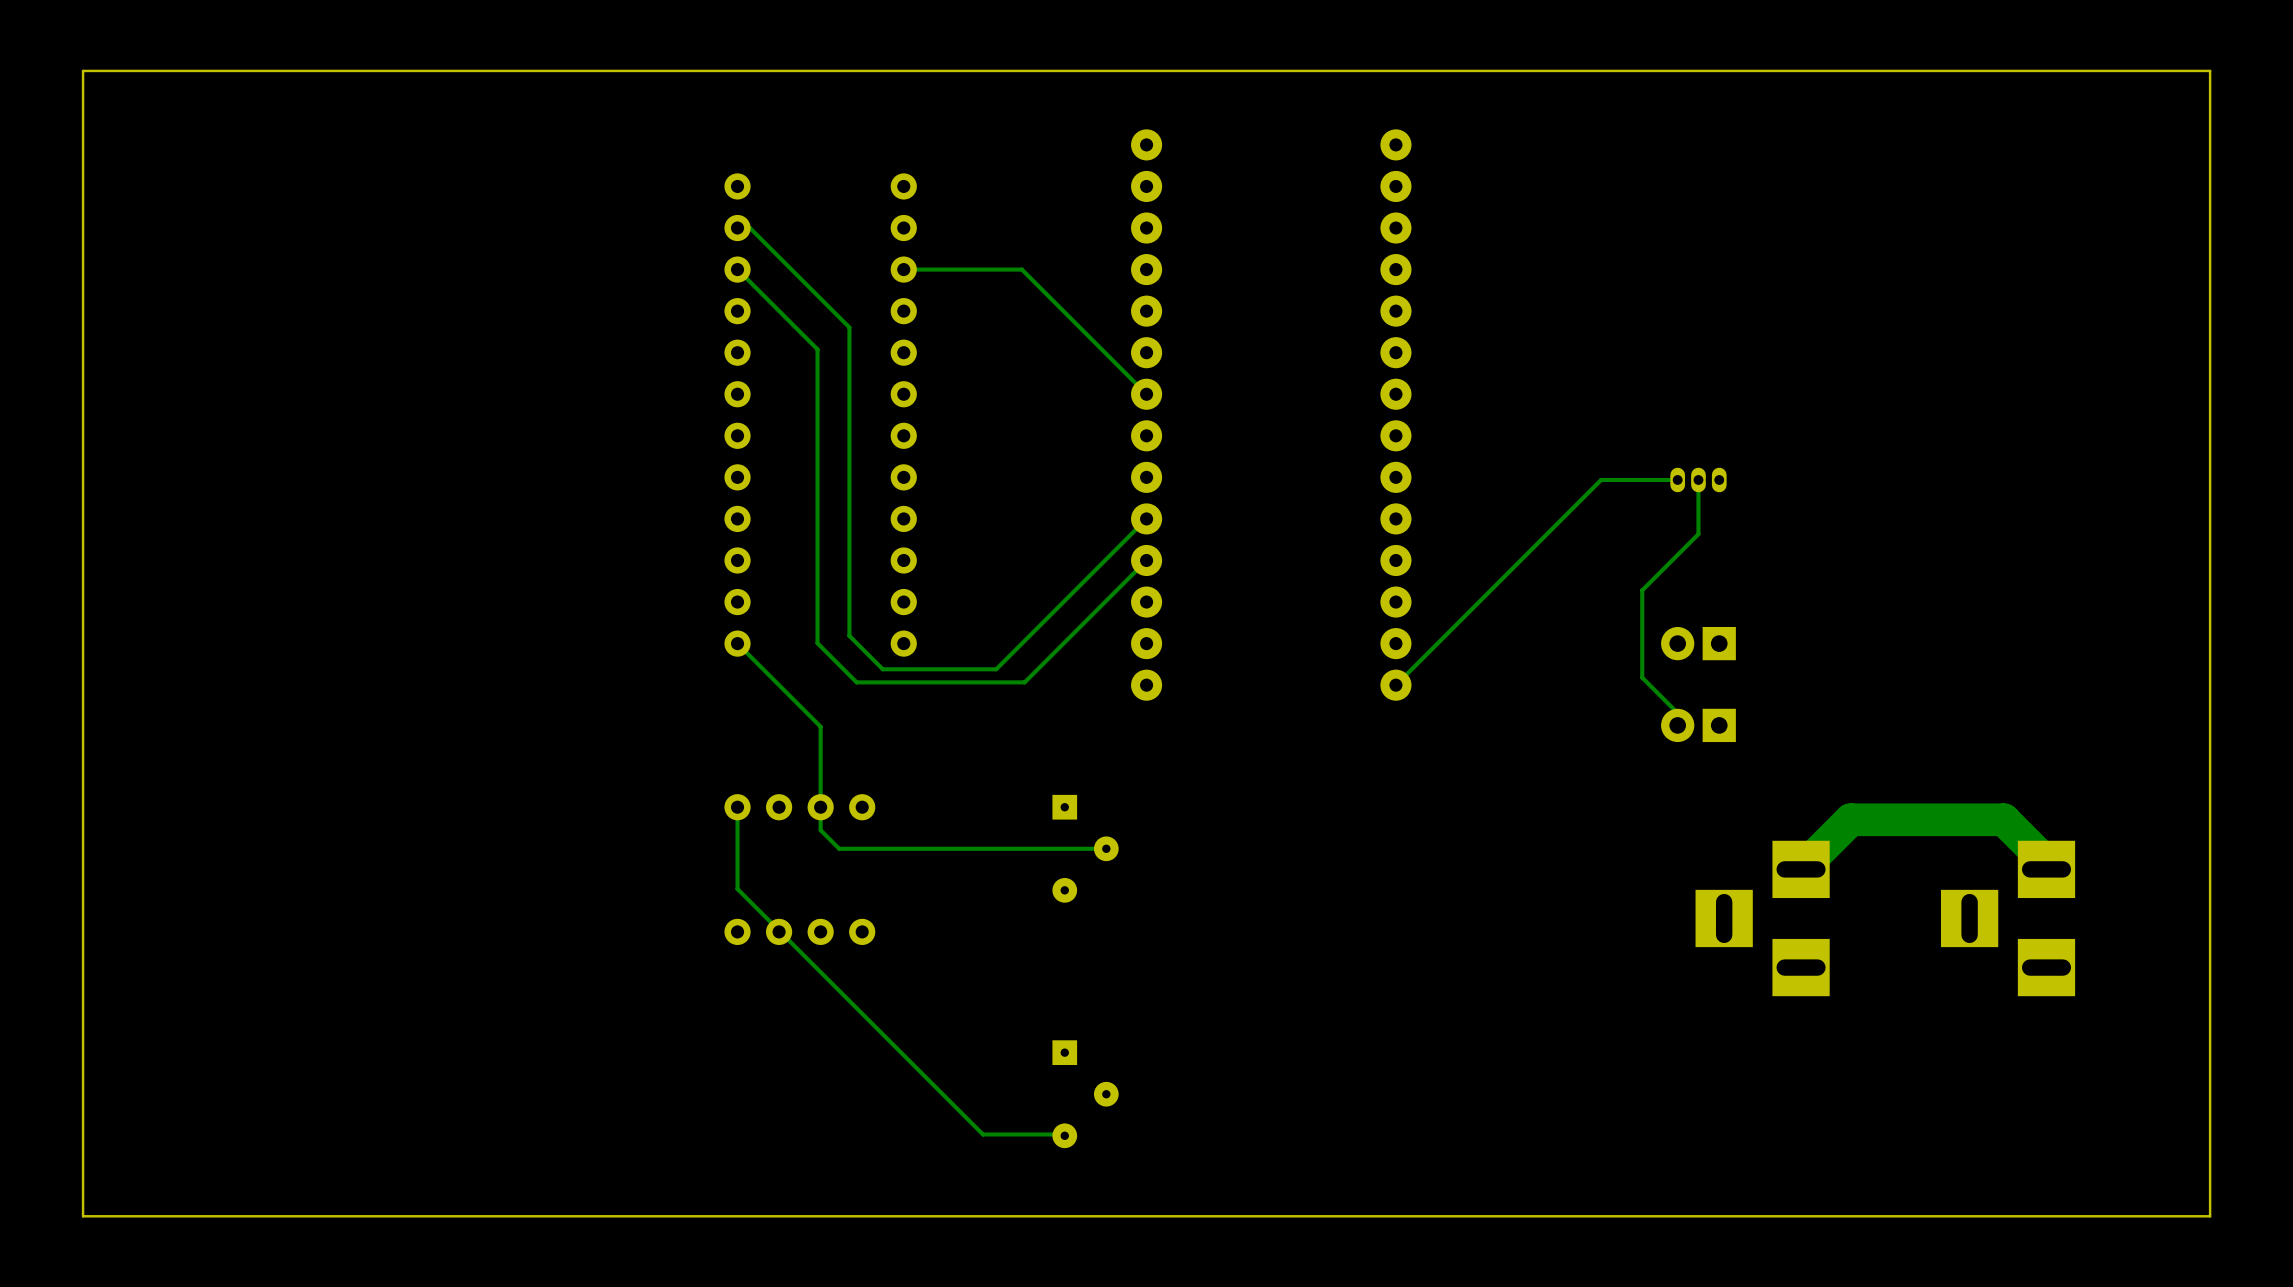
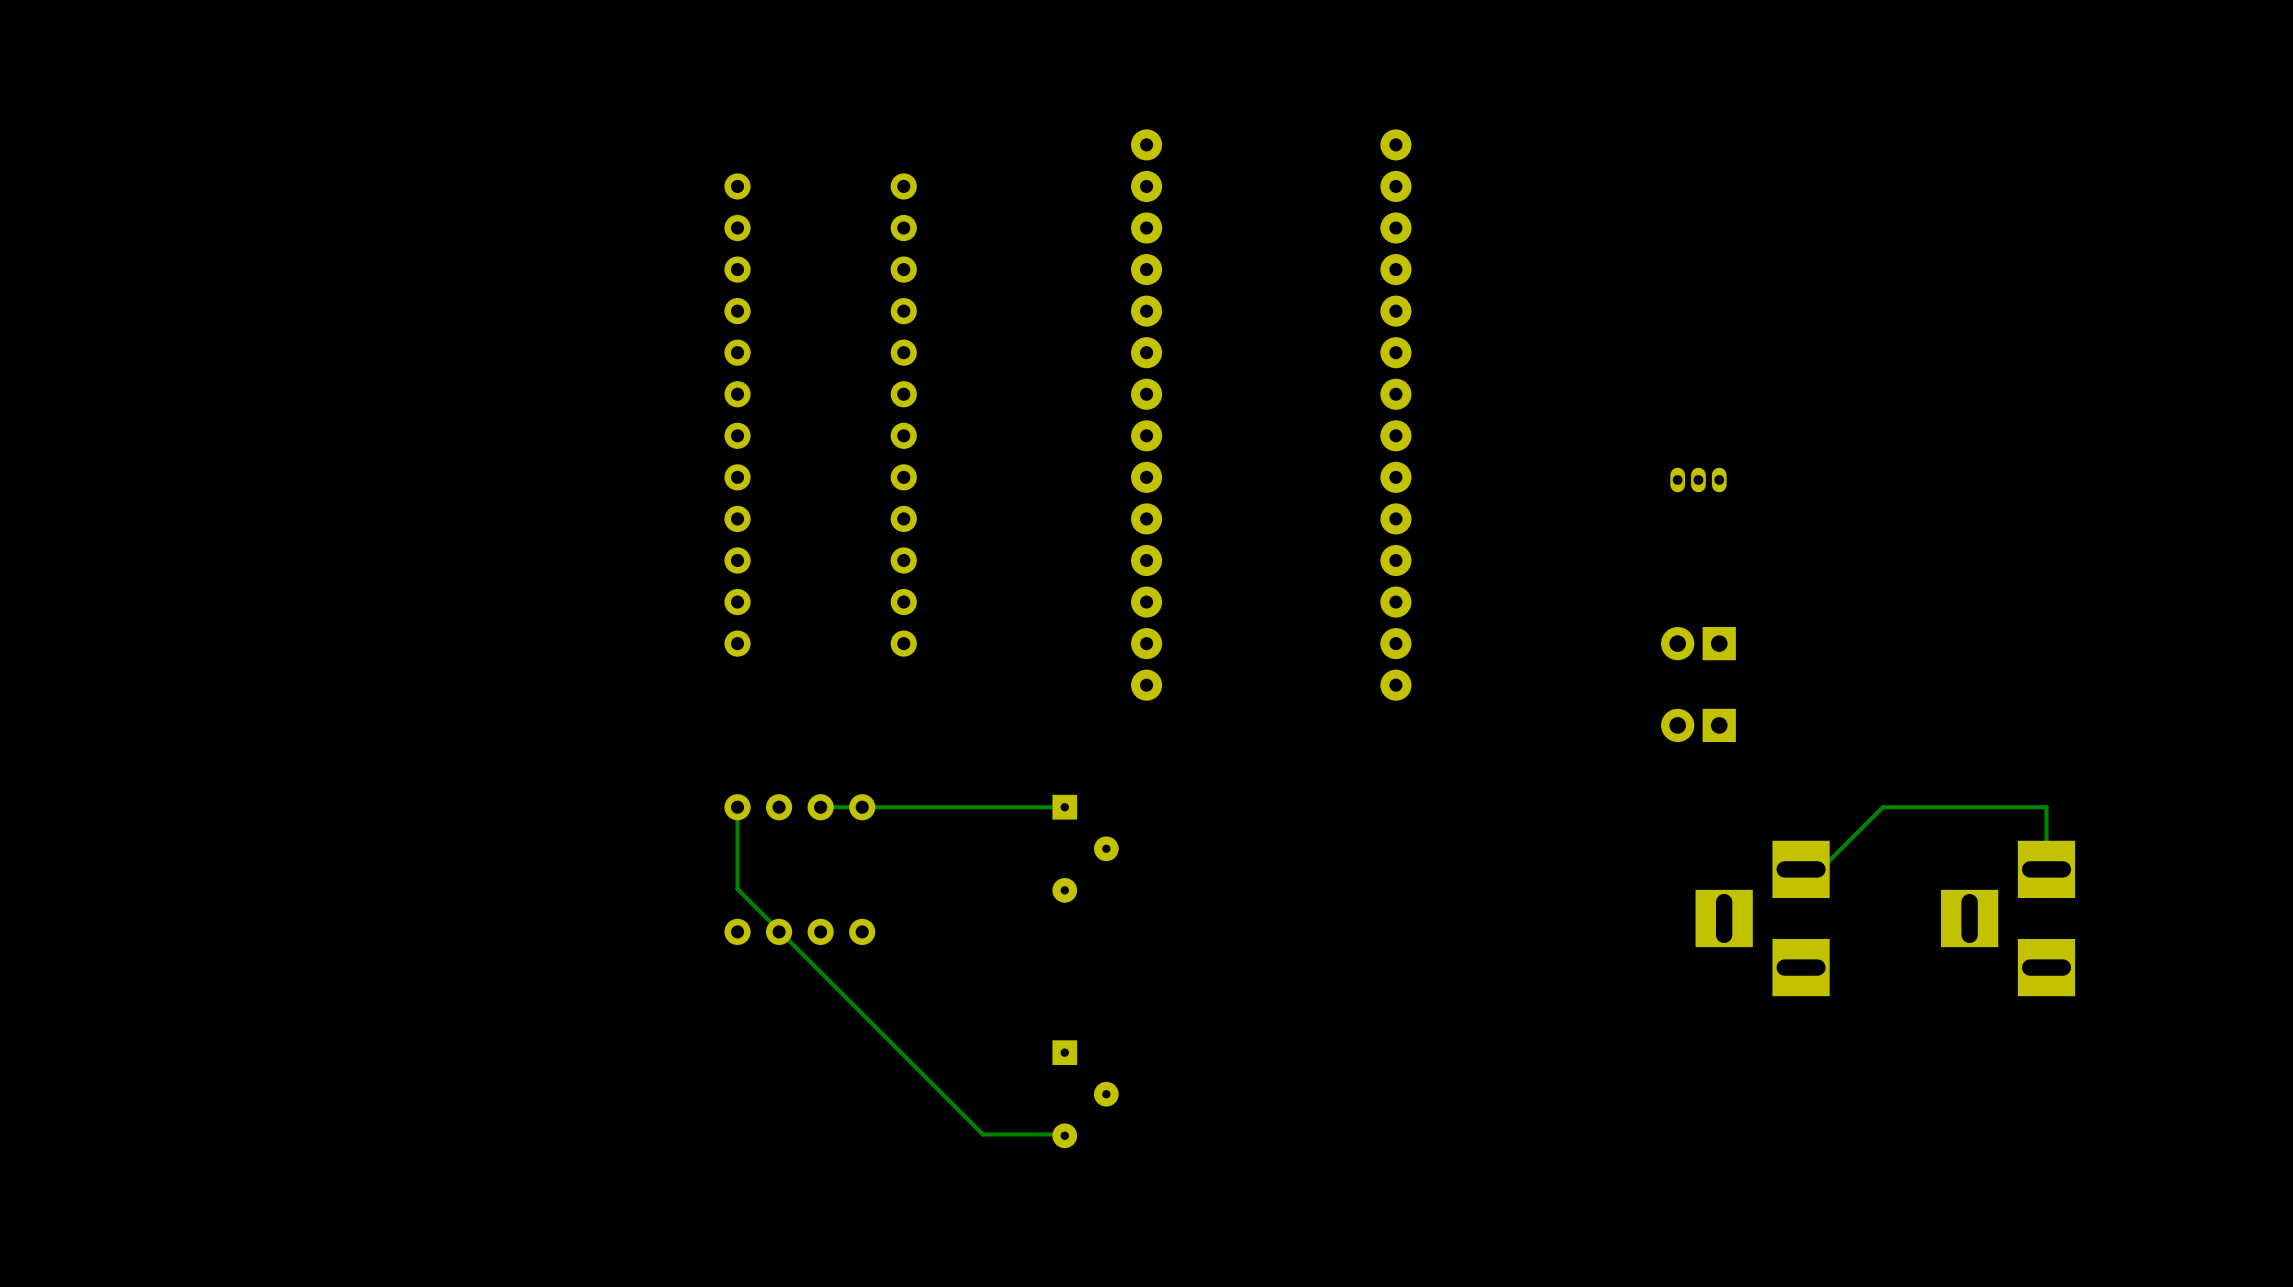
board edge: (2210, 70) (83, 70) (83, 1216) (2210, 1216) (2210, 70) -> none
track: (737, 228) (749, 228) (849, 327) (849, 635) (882, 669) (996, 669) (1146, 518) -> none
track: (737, 269) (817, 349) (817, 643) (856, 682) (1024, 682) (1146, 560) -> none
track: (903, 269) (1021, 269) (1146, 394) -> none
track: (1677, 479) (1601, 479) (1395, 685) -> none
track: (1698, 479) (1698, 534) (1642, 590) (1642, 677) (1677, 713) (1677, 725) -> none
track: (737, 643) (820, 726) (820, 830) (839, 848) (1106, 848) -> none
track: none -> (1064, 807) (820, 807)
track: (2046, 862) (2003, 819) (1850, 819) (1801, 869) -> (2046, 862) (2046, 807) (1882, 807) (1801, 889)

